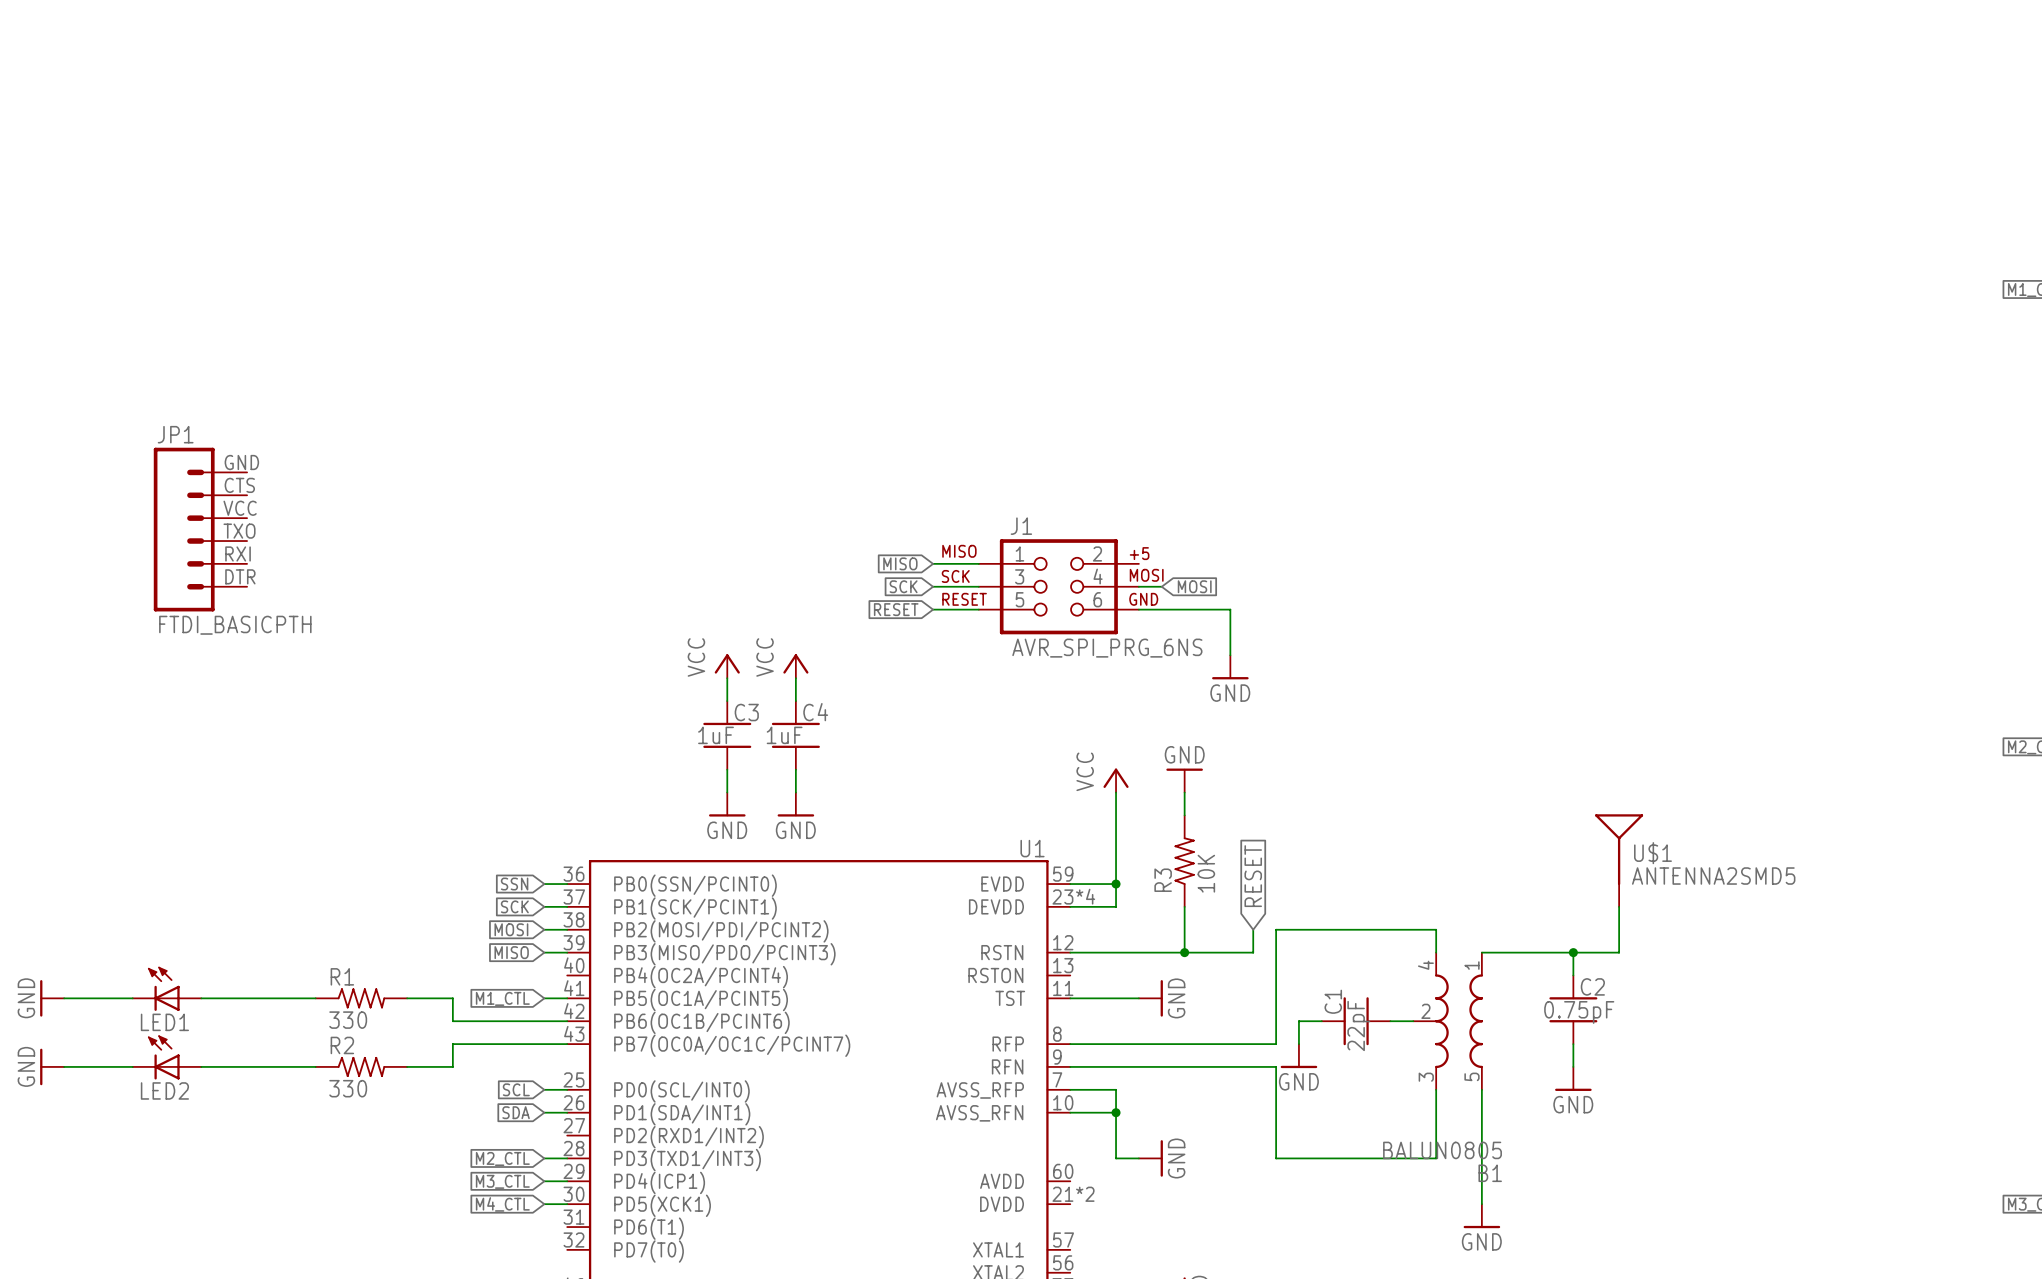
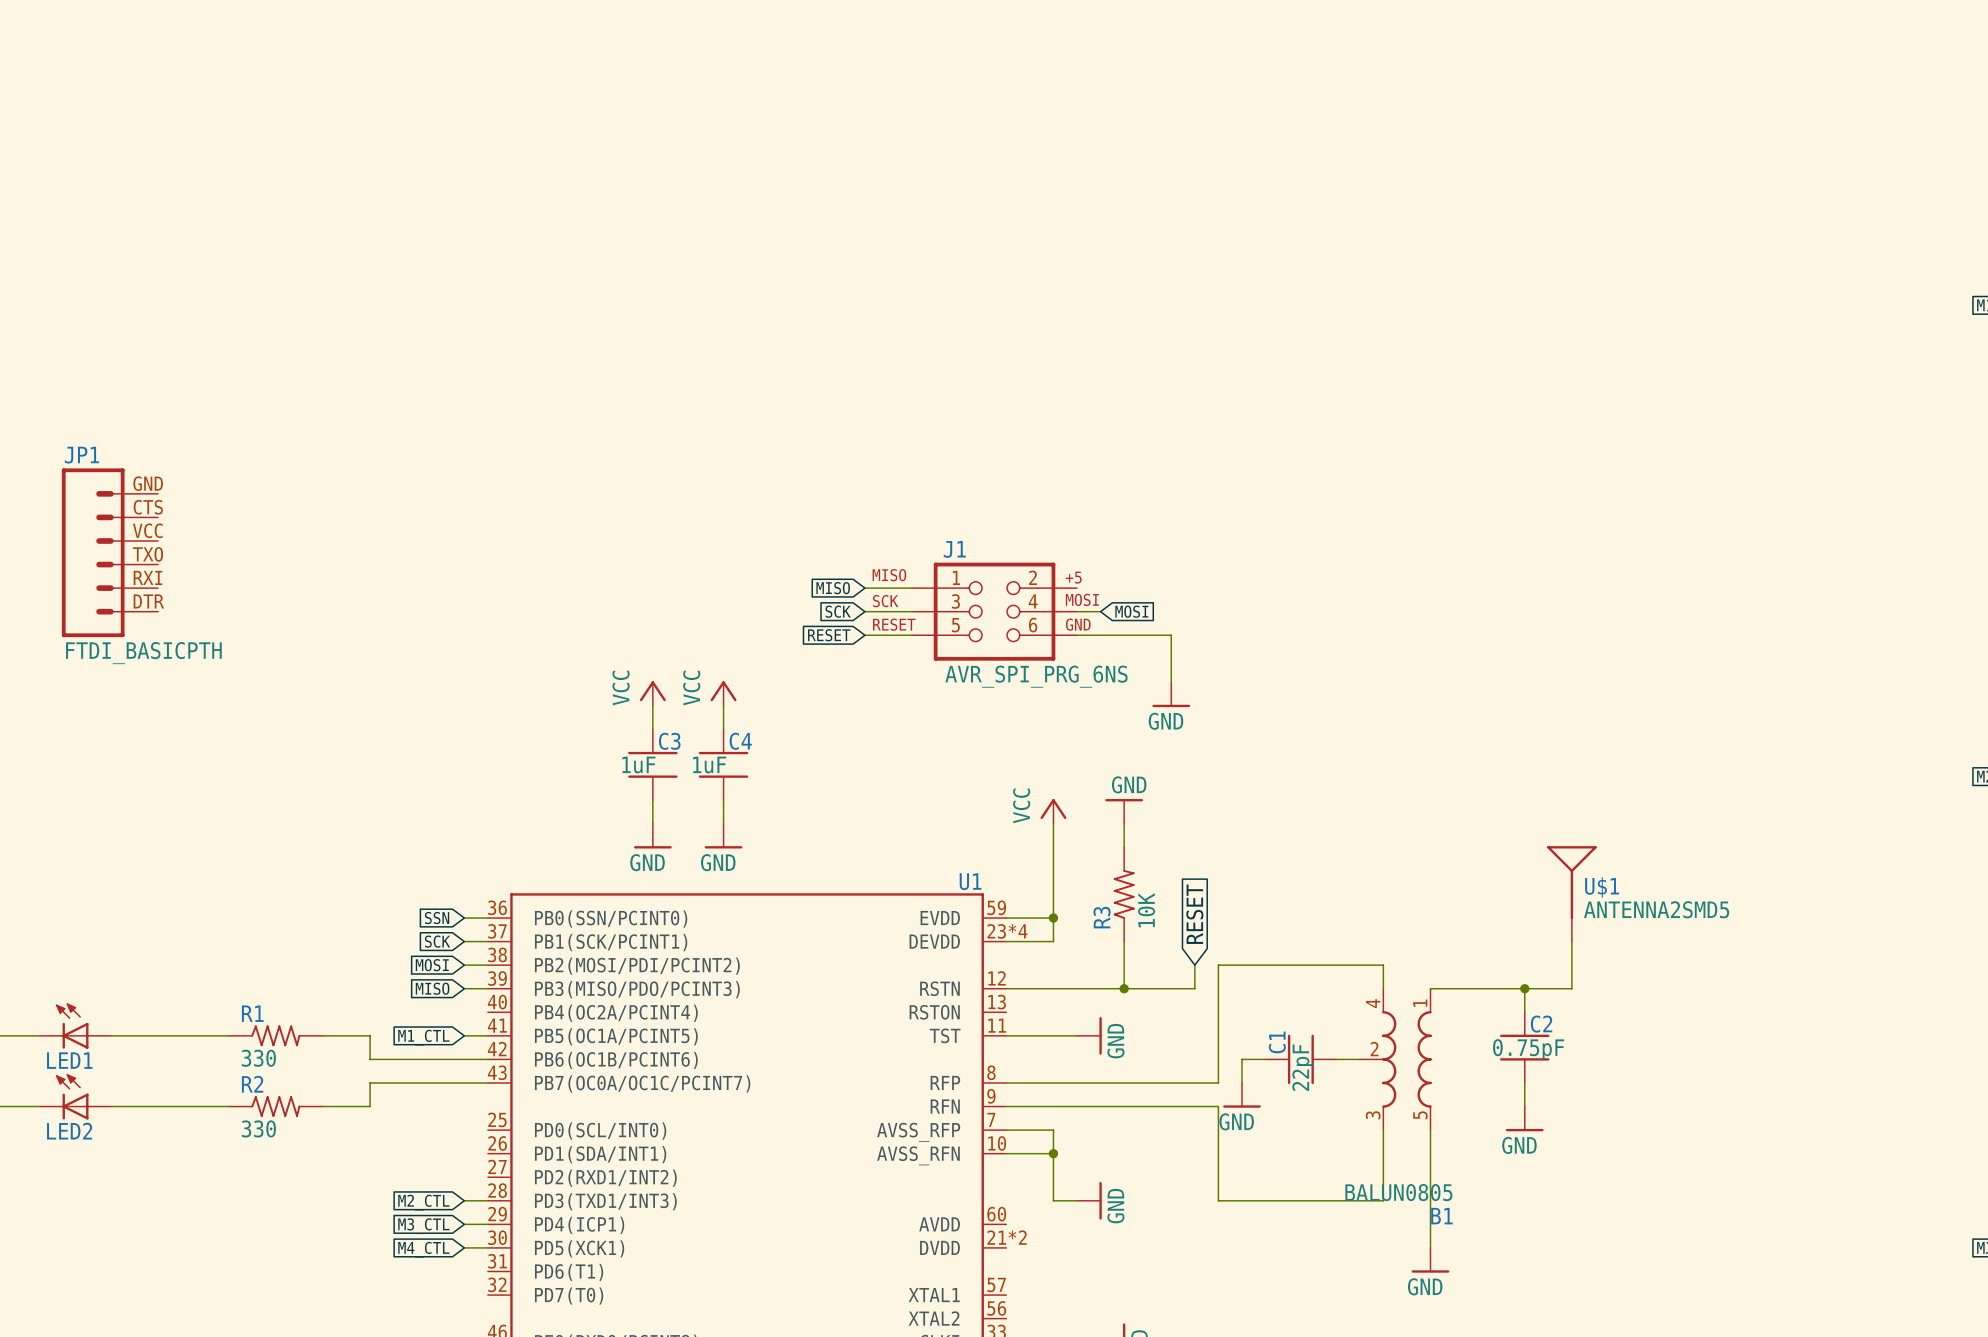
global label: SCL (516, 1089) -> none
wire: (544, 1089) (567, 1089) -> none
global label: SDA (516, 1112) -> none
wire: (544, 1112) (567, 1112) -> none

